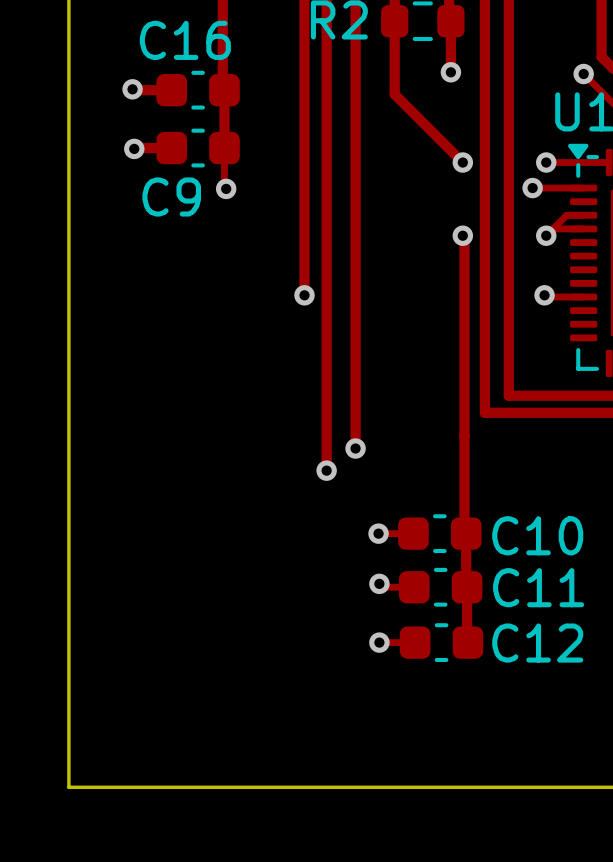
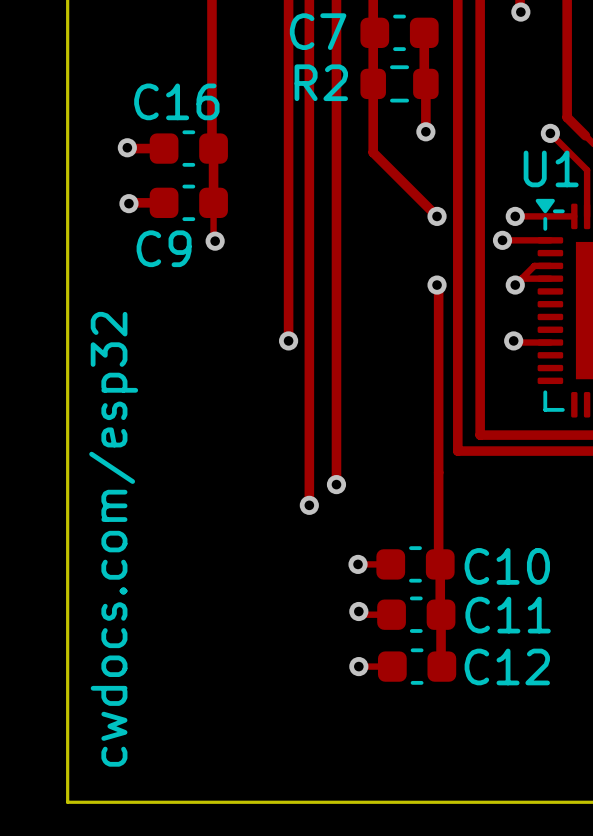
text: none -> cwdocs.com/esp32 (113, 539)

